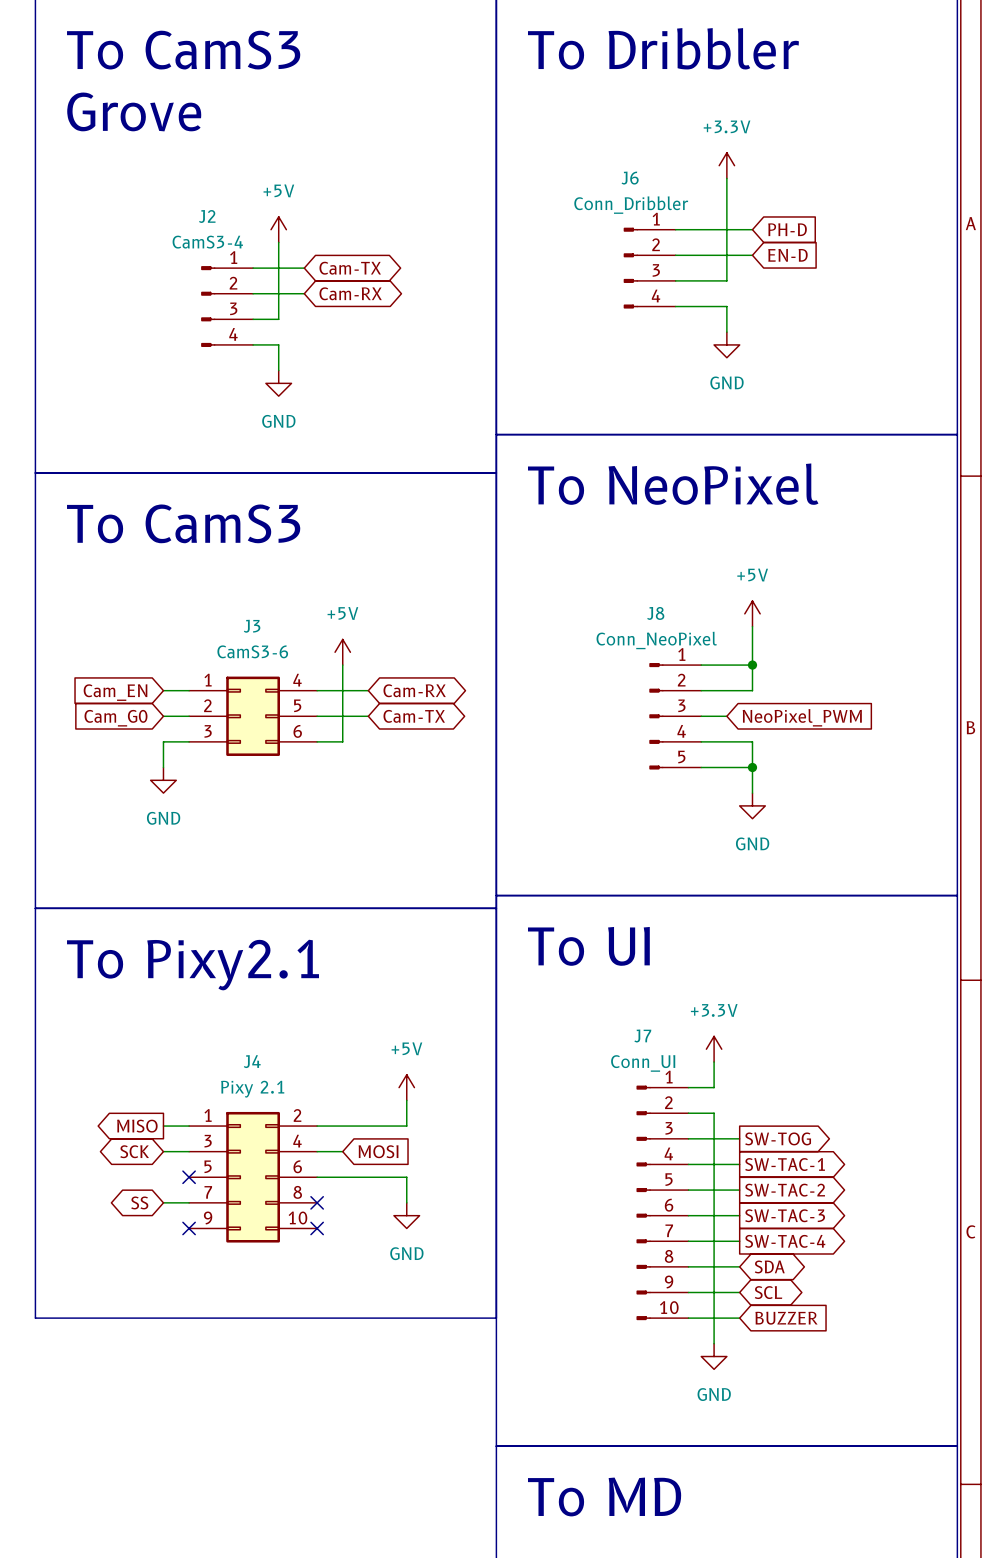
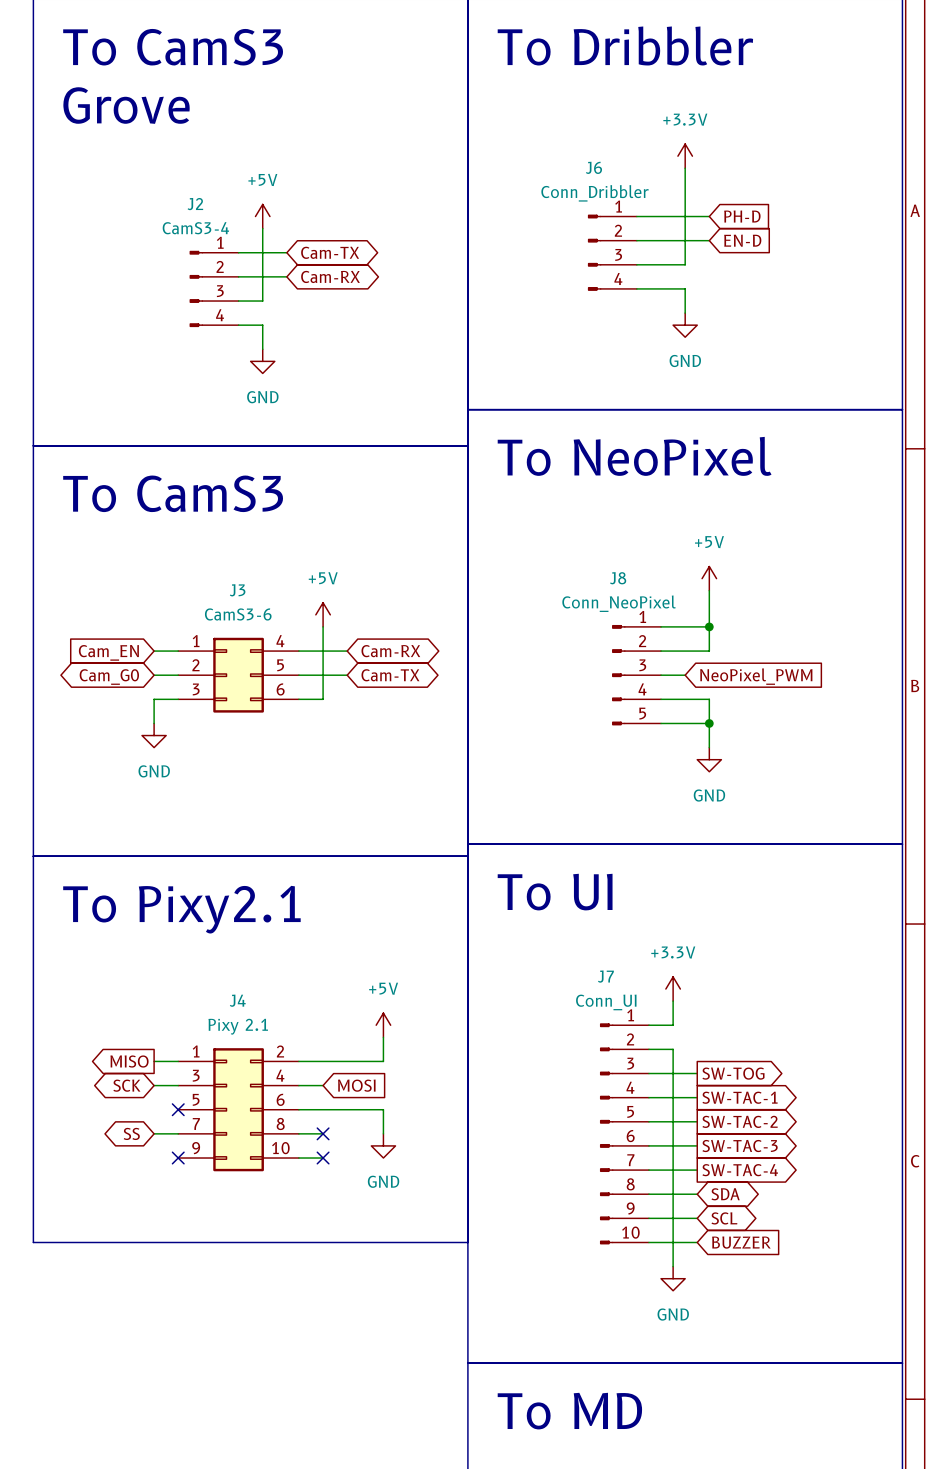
global label shape: input (115, 718) -> bidirectional (109, 677)
wire: none -> (298, 1133) (323, 1133)
no-connect mark: (317, 1202) -> none
no-connect mark: none -> (323, 1133)
wire: none -> (298, 1158) (323, 1158)
no-connect mark: (317, 1228) -> none
no-connect mark: none -> (323, 1158)

